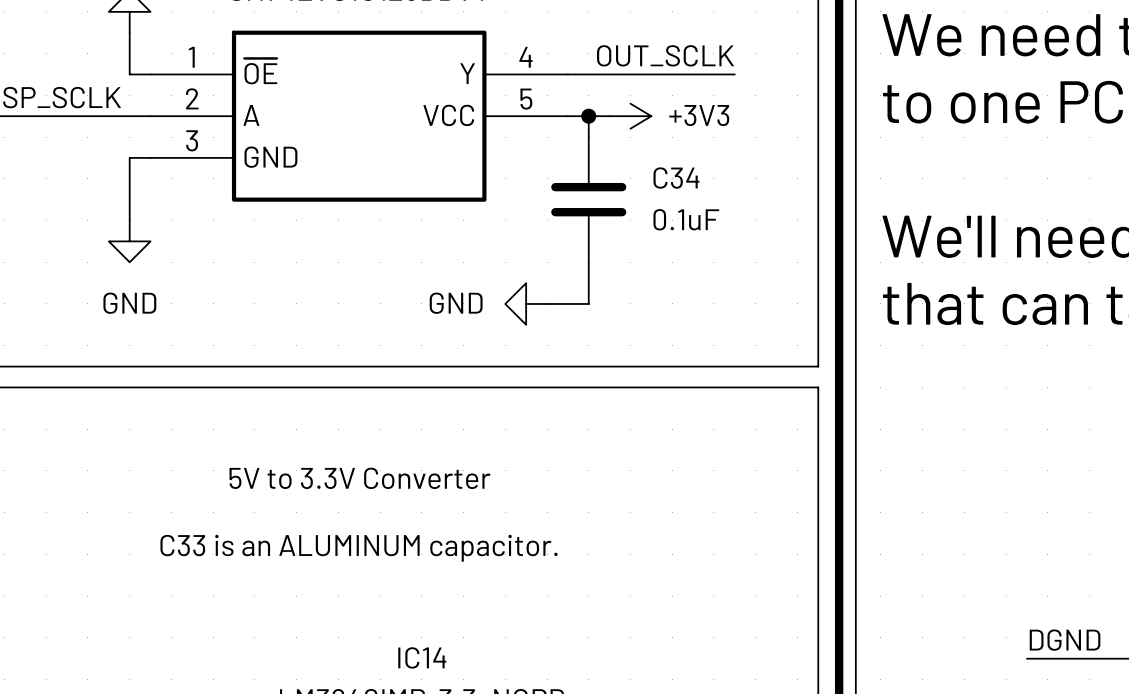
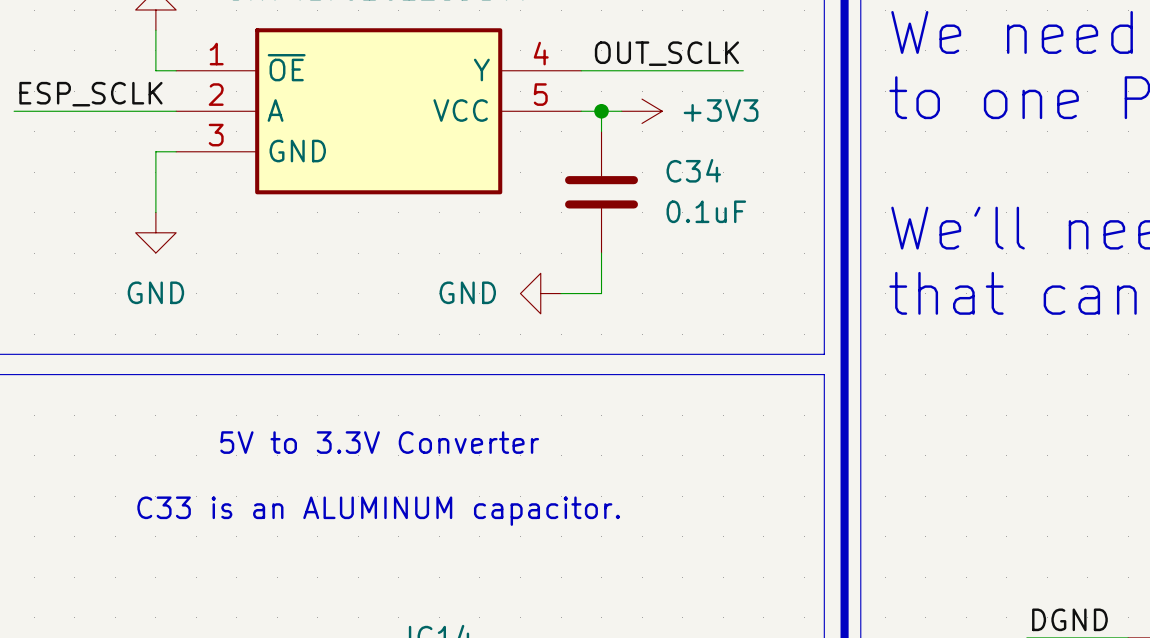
text position: 5V to 3.3V Converter (359, 478) -> 5V to 3.3V Converter (379, 442)
text position: C33 is an ALUMINUM capacitor. (359, 548) -> C33 is an ALUMINUM capacitor. (378, 511)

